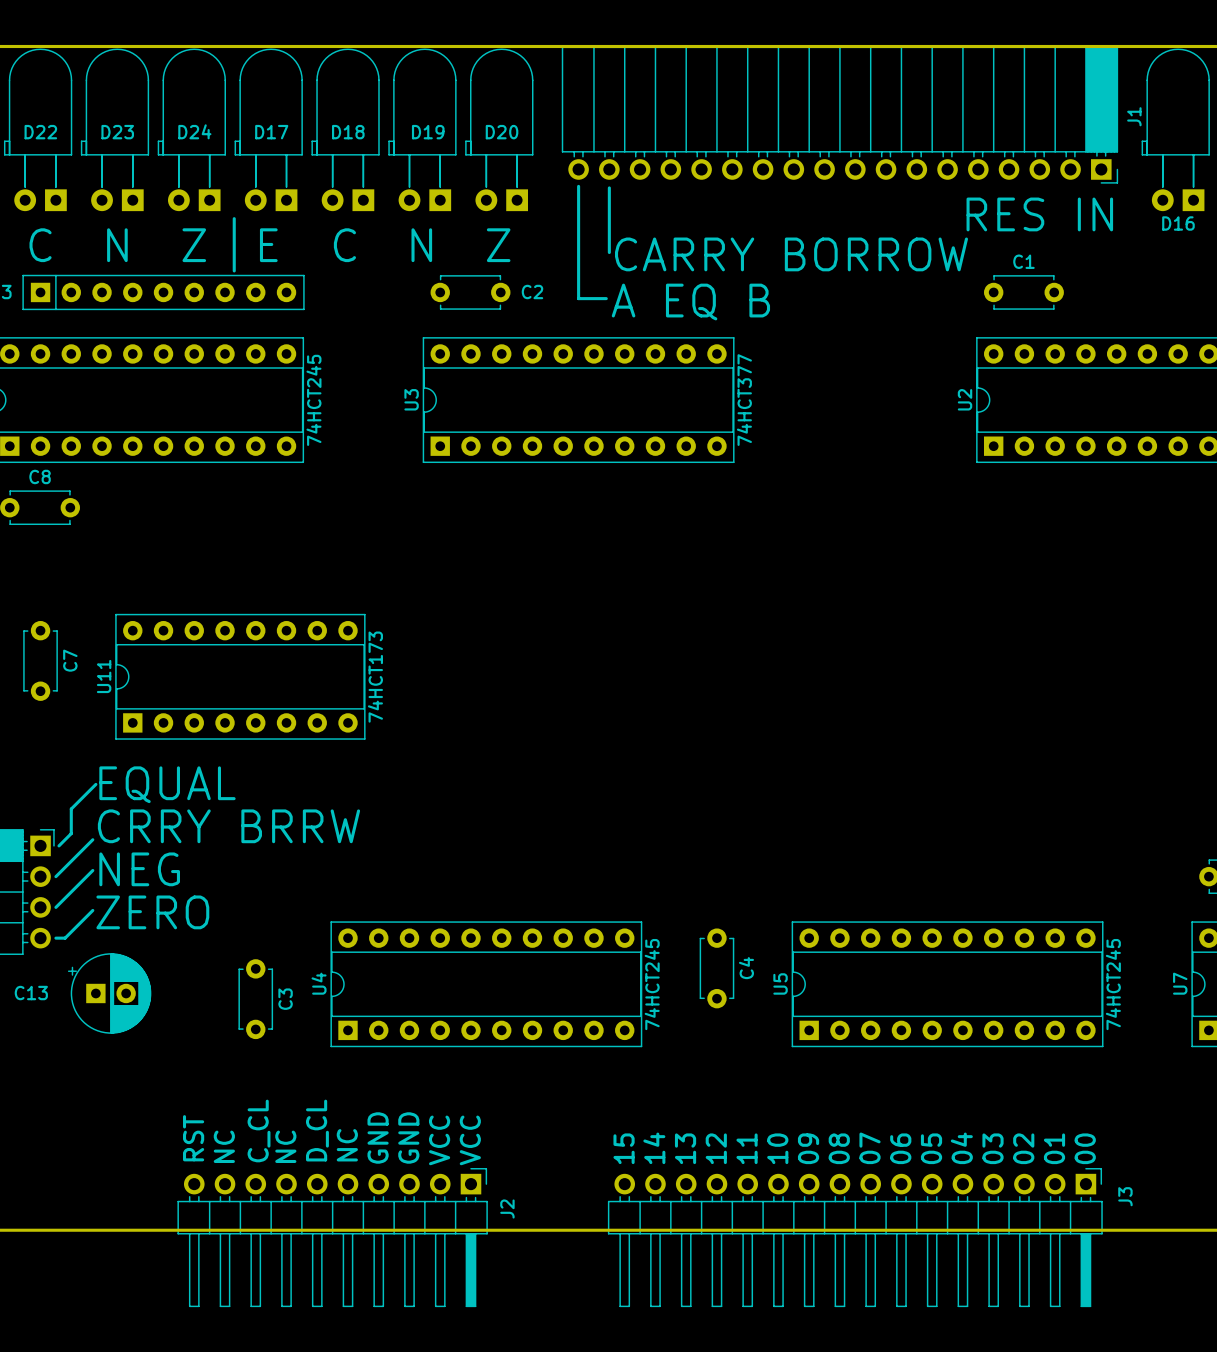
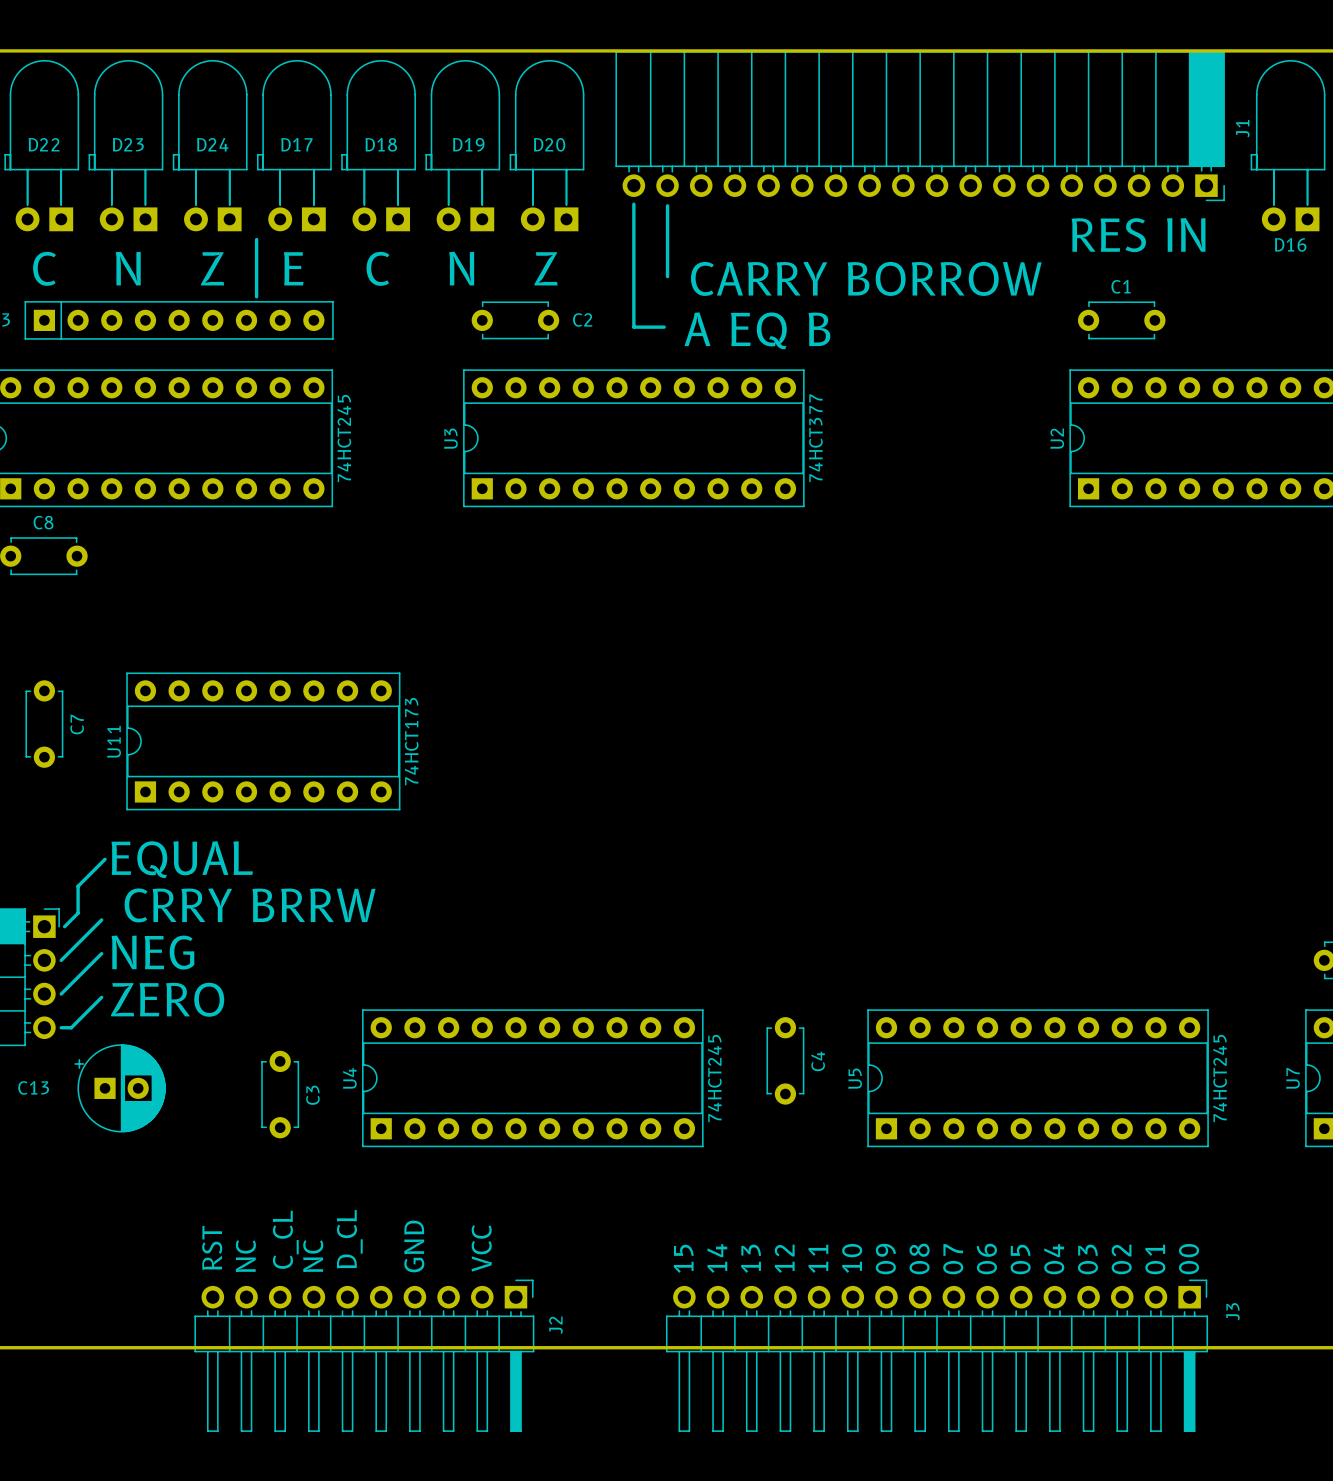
D22 footprint: [3, 48, 73, 212] -> [4, 59, 80, 232]
D23 footprint: [80, 48, 150, 212] -> [88, 59, 164, 232]
D24 footprint: [157, 48, 226, 212] -> [172, 59, 248, 232]
D17 footprint: [234, 48, 303, 212] -> [256, 59, 332, 232]
D18 footprint: [311, 48, 380, 212] -> [341, 59, 416, 232]
D19 footprint: [388, 48, 457, 212] -> [425, 59, 501, 232]
D20 footprint: [465, 48, 534, 212] -> [509, 59, 585, 232]
D16 footprint: [1141, 48, 1210, 212] -> [1250, 59, 1326, 232]
J2 text: GND (408, 1138) -> none
J2 text: VCC (470, 1140) -> none
J2 text: NC (347, 1145) -> none

